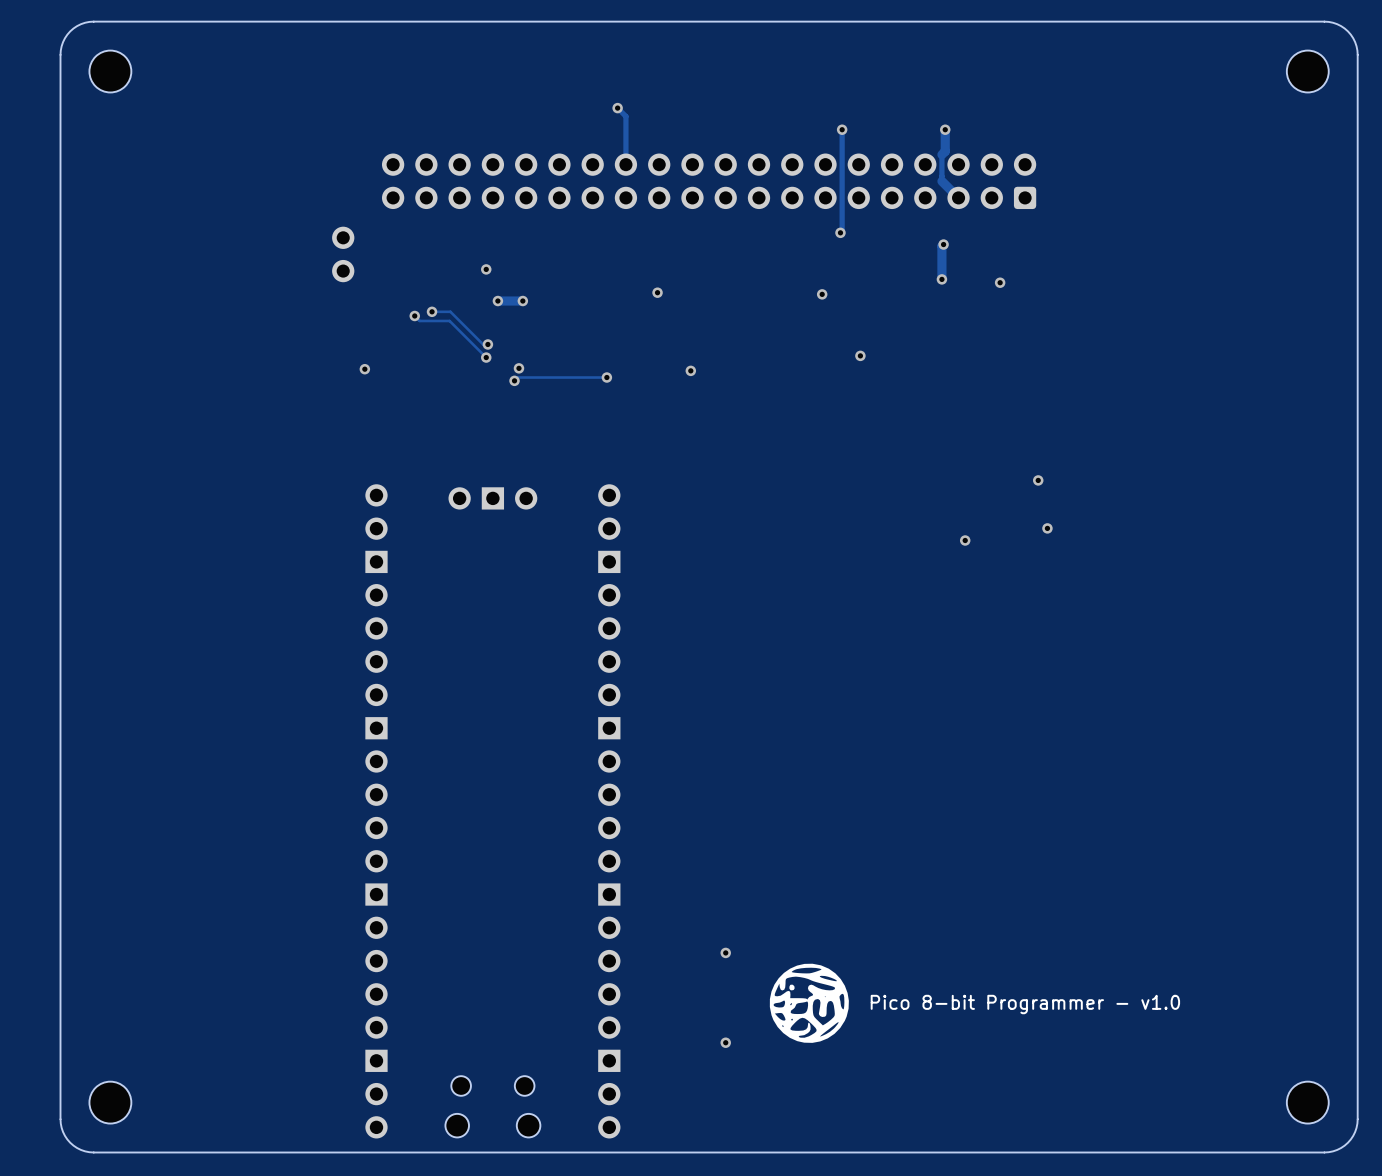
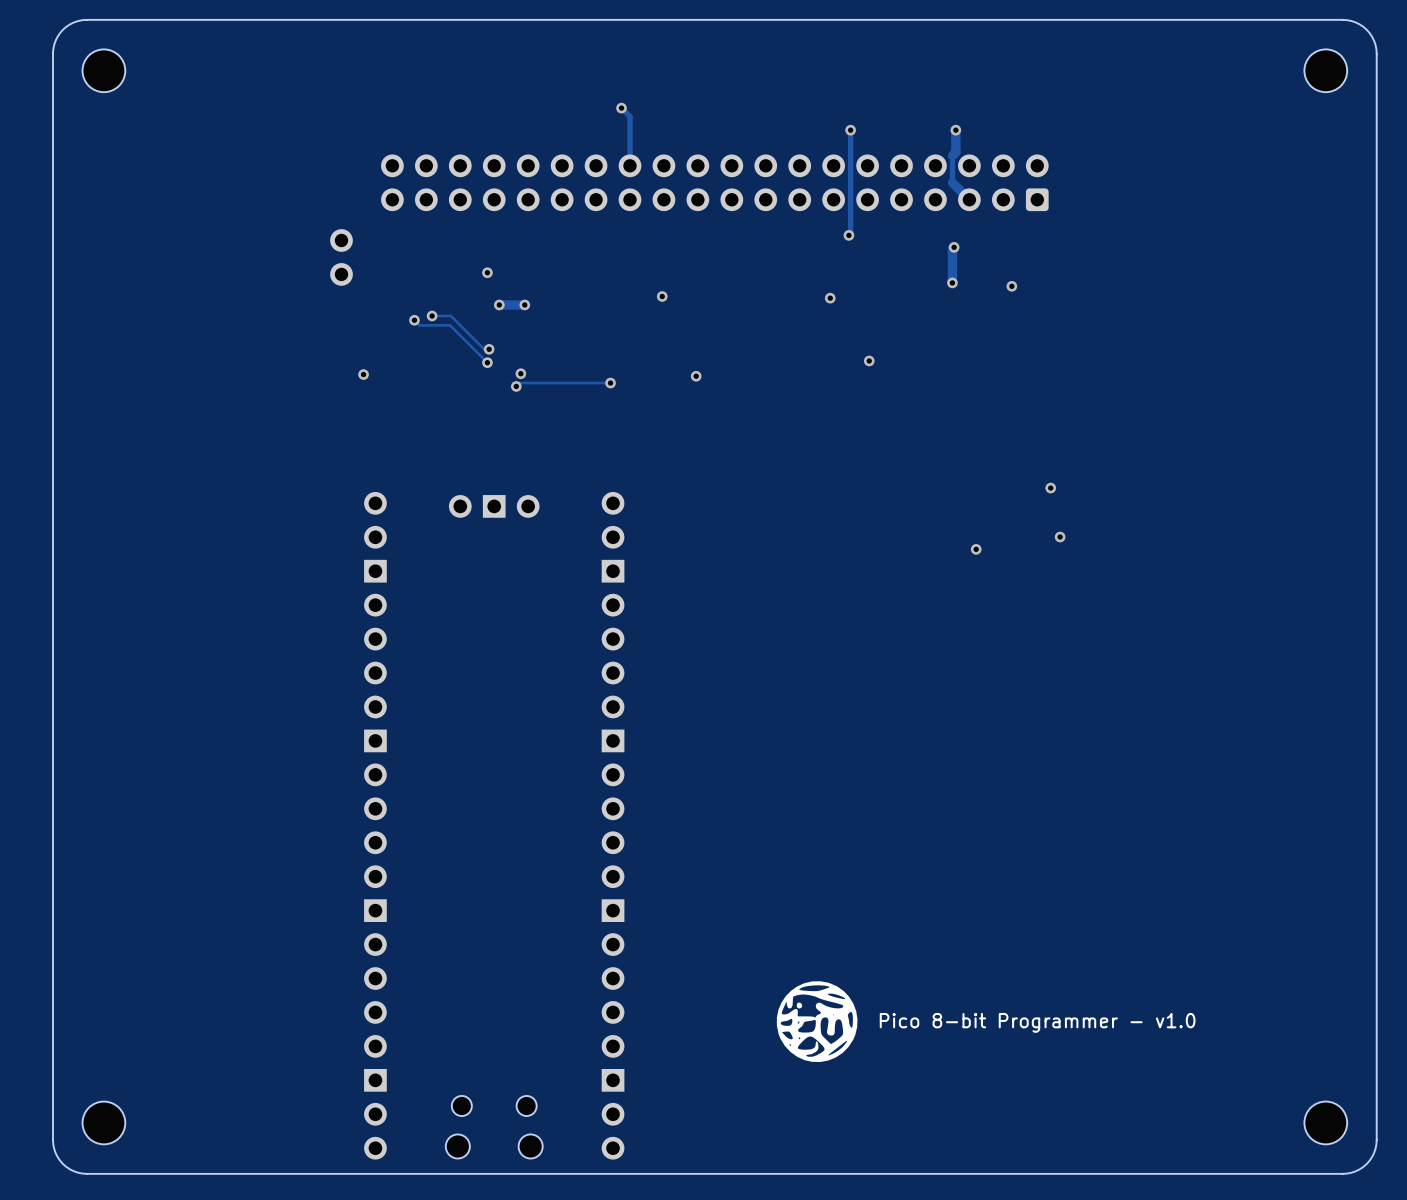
via: (725, 952) -> none
via: (725, 1042) -> none

